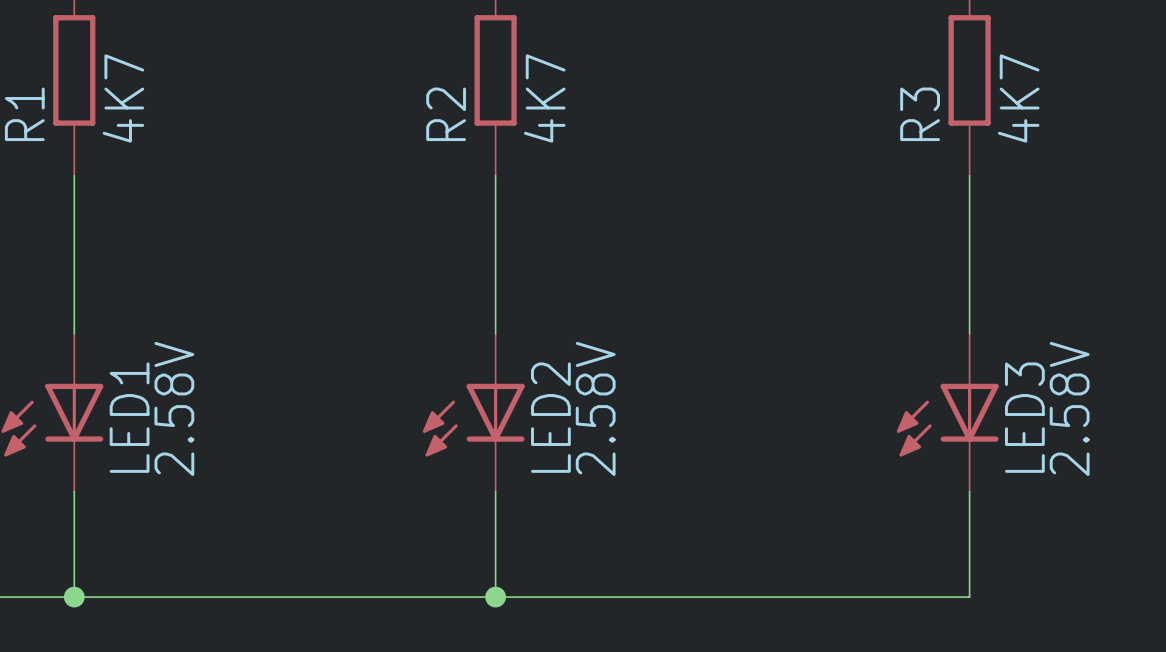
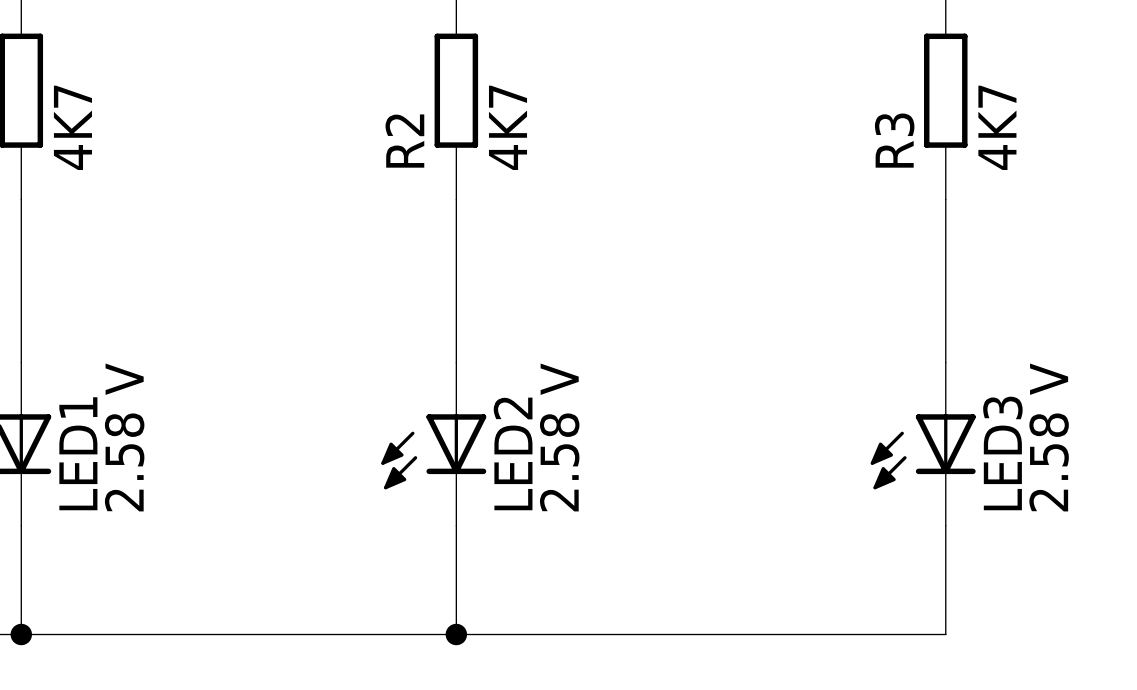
LED1 value: 2.58V (174, 408) -> 2.58 V (124, 437)
LED2 value: 2.58V (595, 408) -> 2.58 V (559, 437)
LED3 value: 2.58V (1069, 408) -> 2.58 V (1049, 437)

